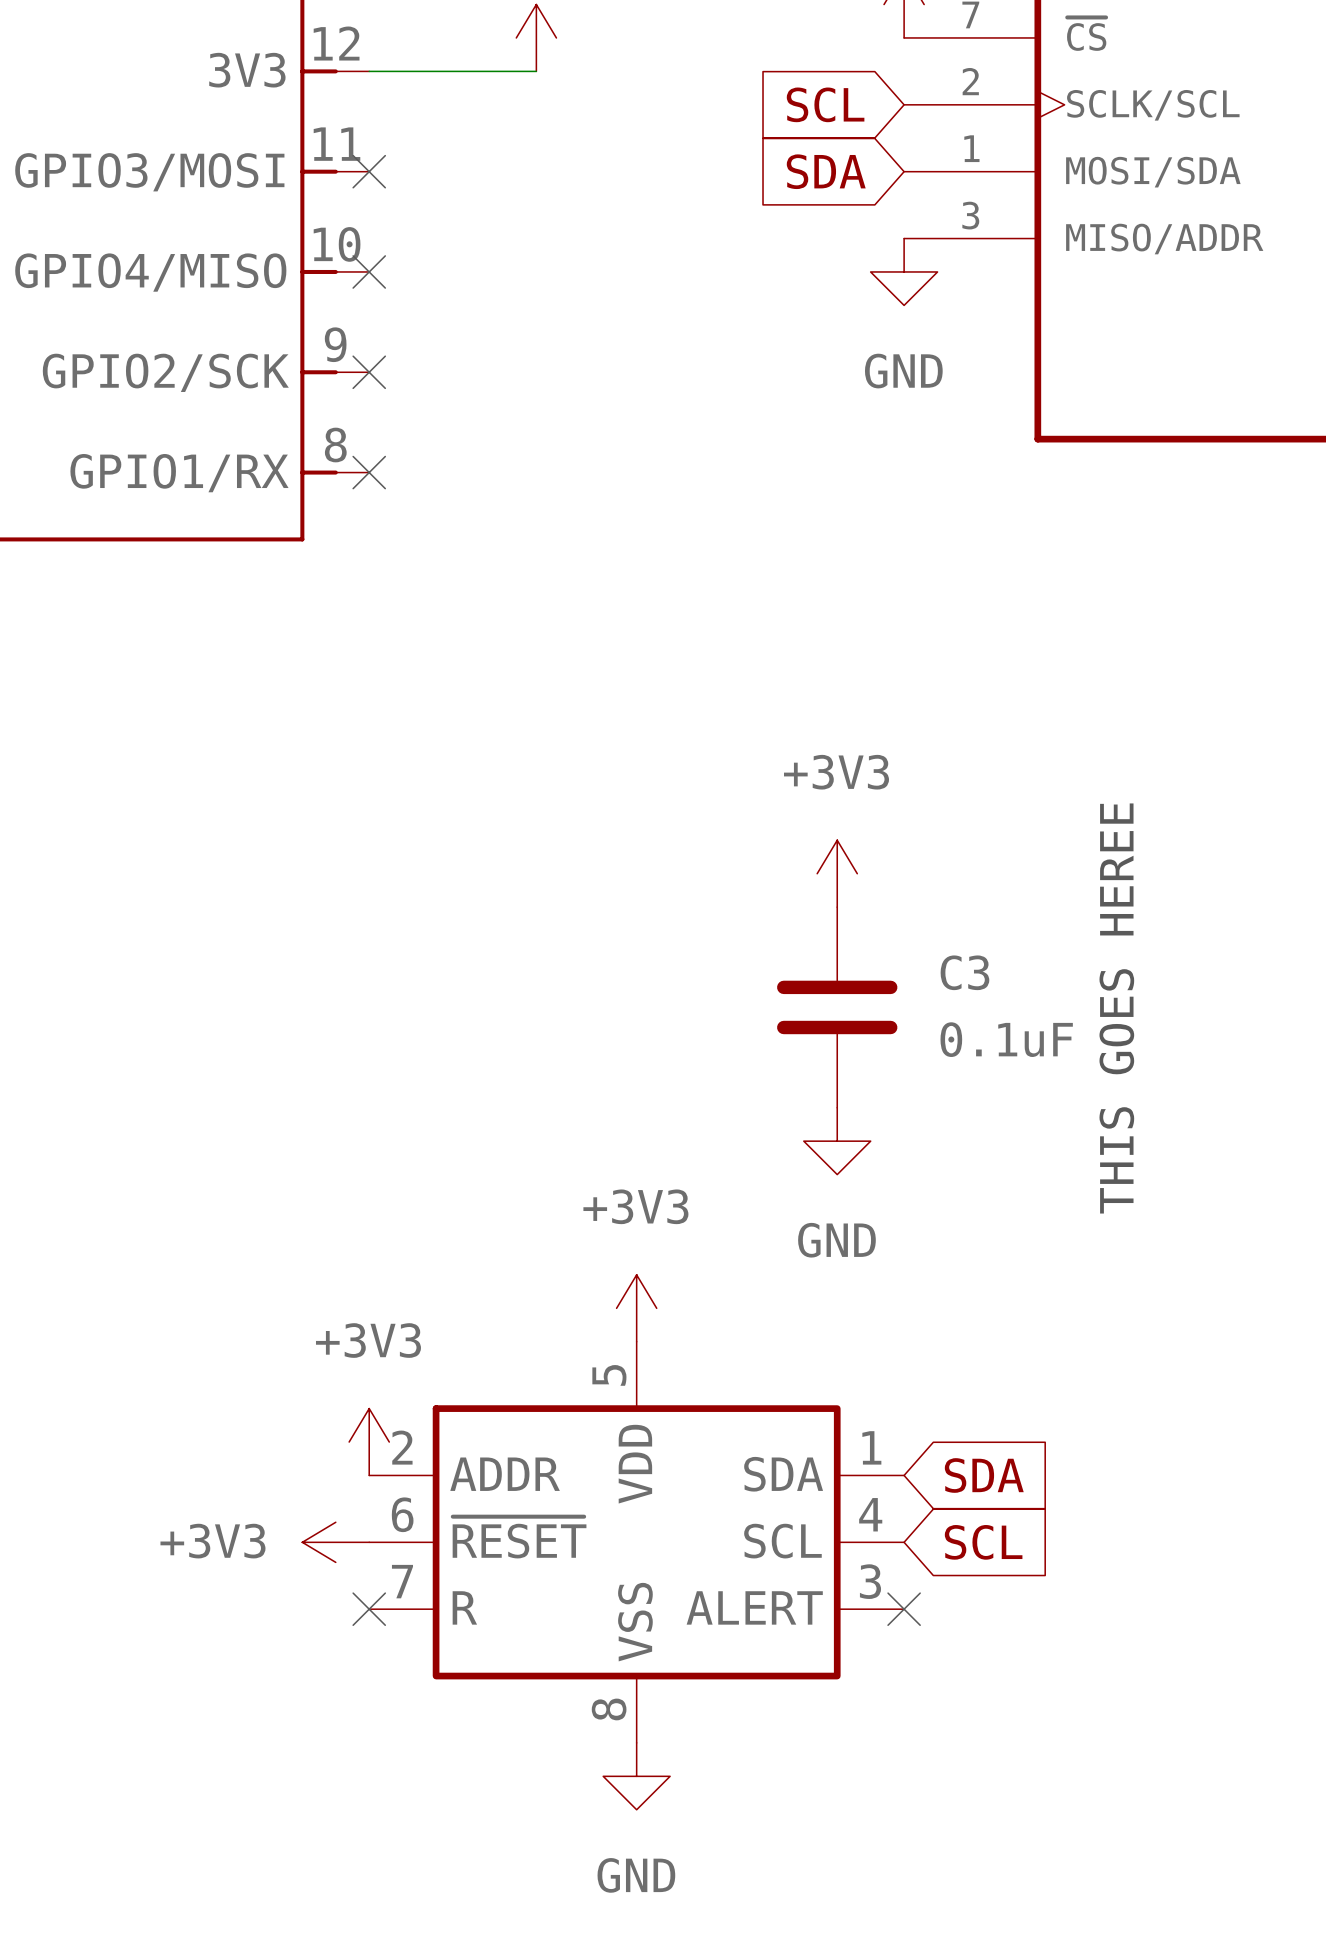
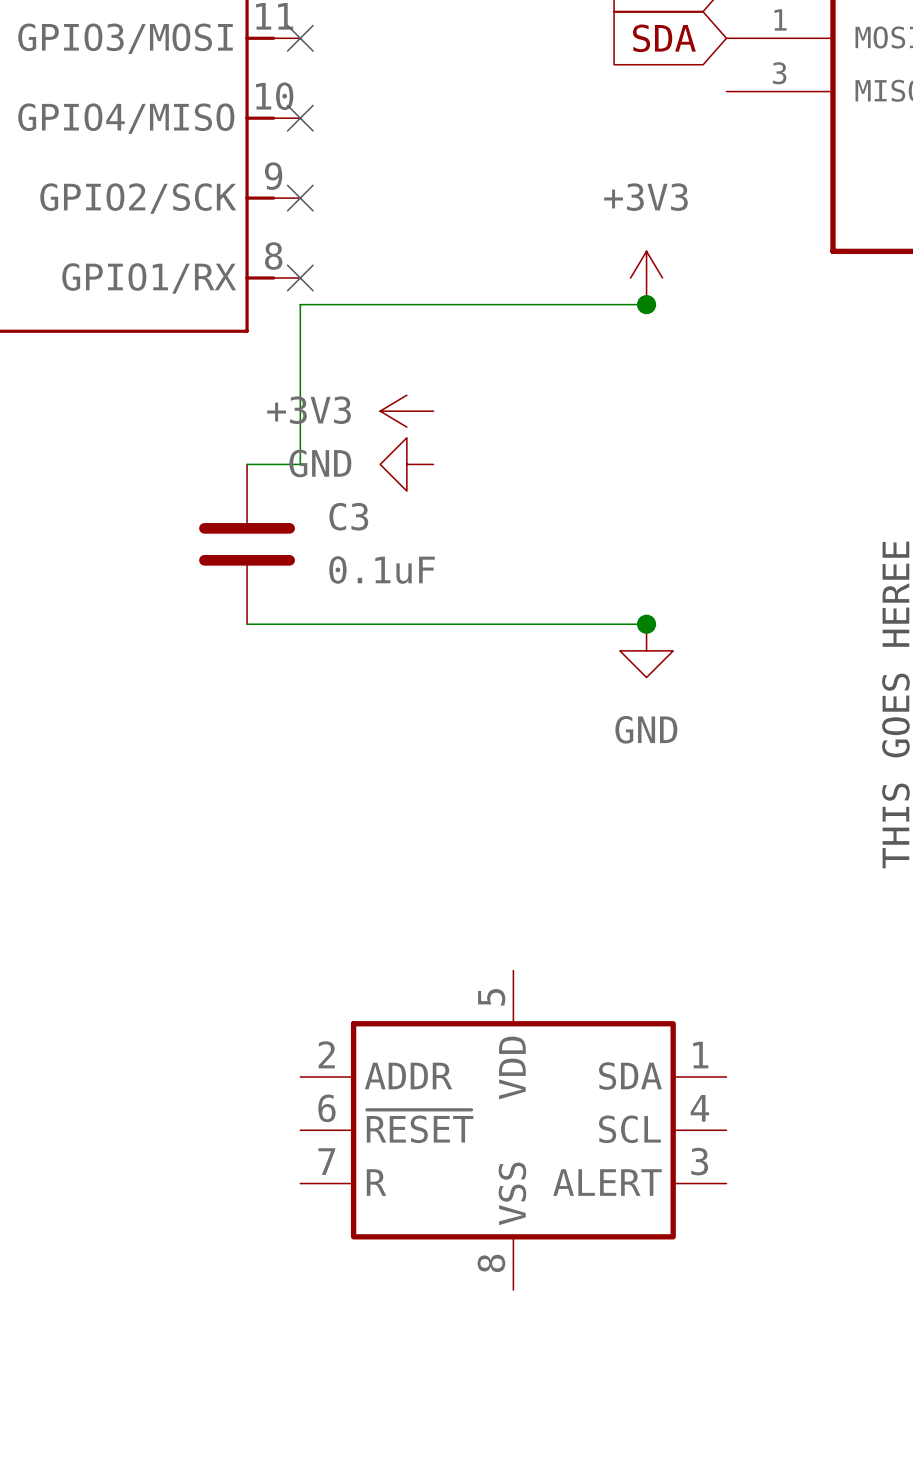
power symbol: GND (904, 271) -> none
power symbol: none -> +3V3 (646, 277)
wire: none -> (646, 304) (300, 304) (300, 464) (247, 464)
junction: none -> (646, 304)
power symbol: none -> +3V3 (406, 411)
power symbol: none -> GND (406, 464)
power symbol: +3V3 (837, 873) -> none
wire: none -> (247, 624) (646, 624)
junction: none -> (646, 624)
C3 position: (837, 1007) -> (247, 544)
power symbol position: GND (837, 1141) -> GND (646, 650)
power symbol: +3V3 (636, 1308) -> none
power symbol: +3V3 (369, 1442) -> none
global label: SDA (984, 1475) -> none
power symbol: +3V3 (335, 1542) -> none
global label: SCL (983, 1542) -> none
no-connect mark: (369, 1609) -> none
no-connect mark: (904, 1609) -> none
power symbol: GND (636, 1776) -> none

